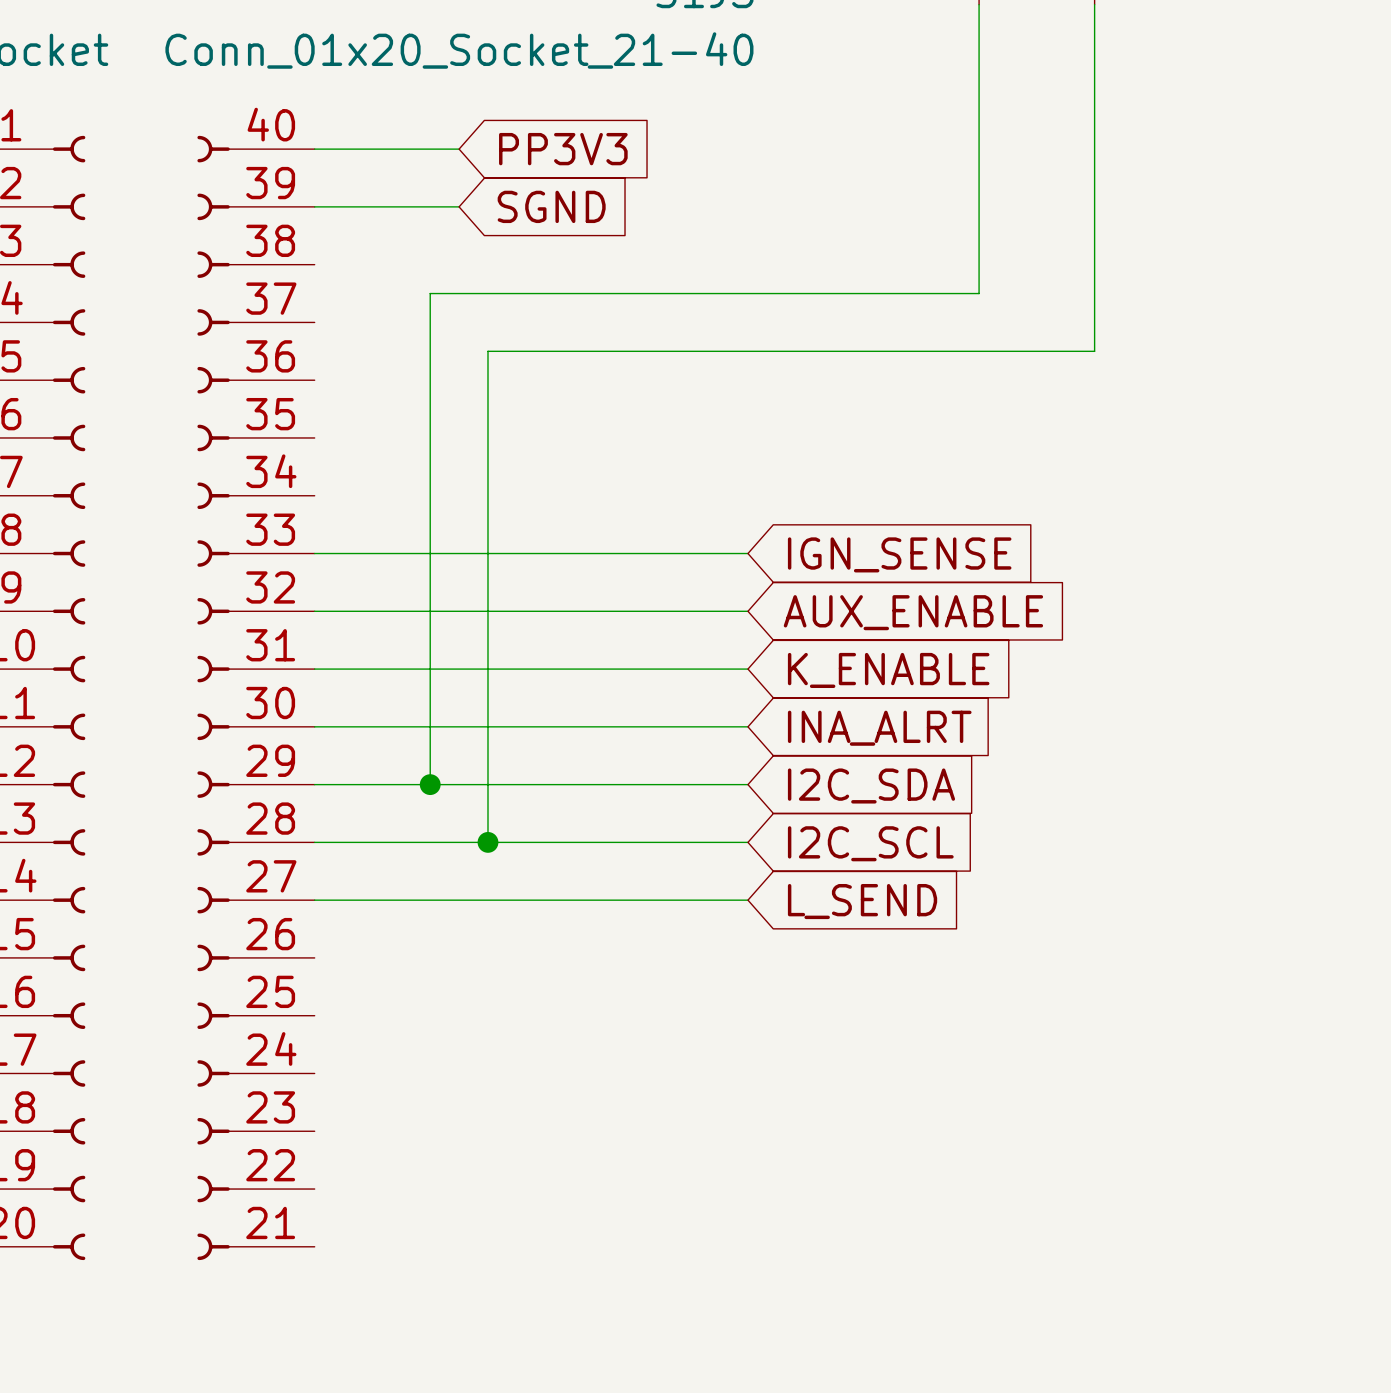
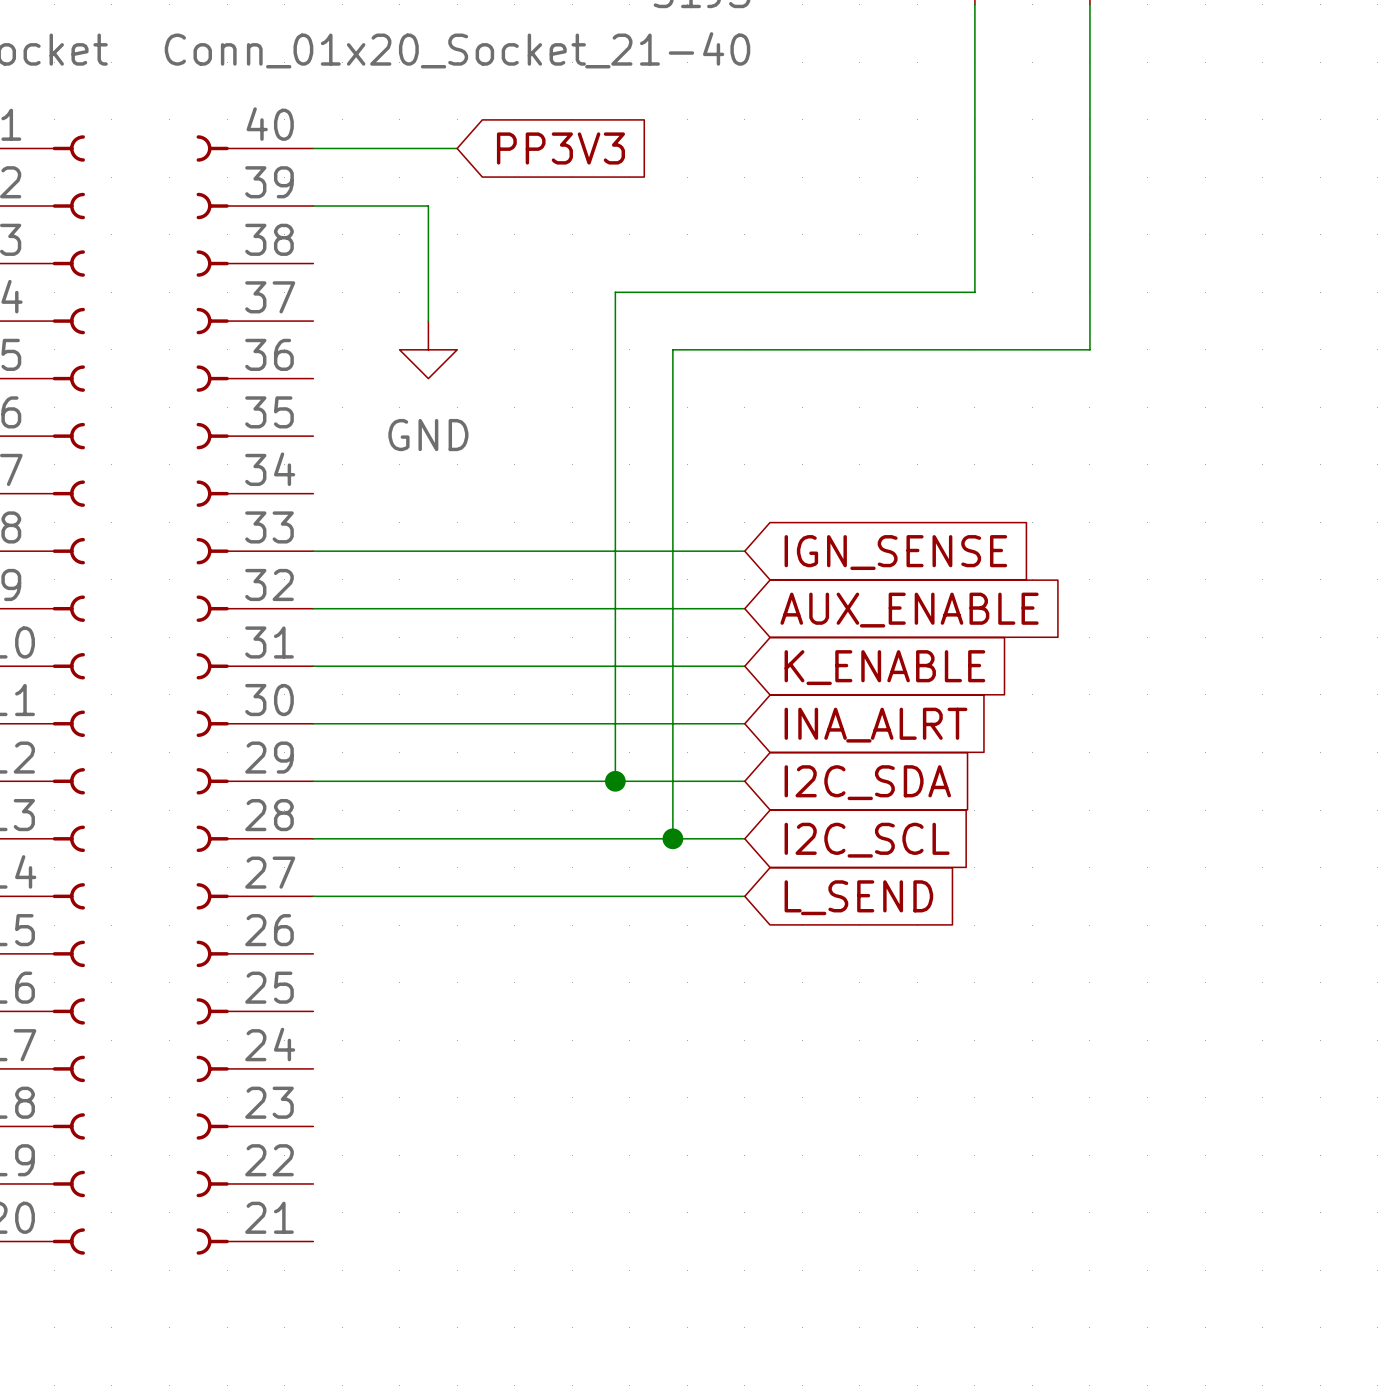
wire: (430, 206) (459, 206) -> (428, 206) (428, 292)
global label: SGND (551, 206) -> none
wire: (430, 293) (617, 293) -> (615, 781) (615, 292)
wire: (430, 322) (430, 784) -> none
power symbol: none -> GND (428, 349)
wire: (675, 351) (487, 351) (487, 842) -> (672, 349) (672, 838)
junction: (430, 784) -> none
junction: none -> (615, 781)
junction: (487, 842) -> none
junction: none -> (672, 838)

